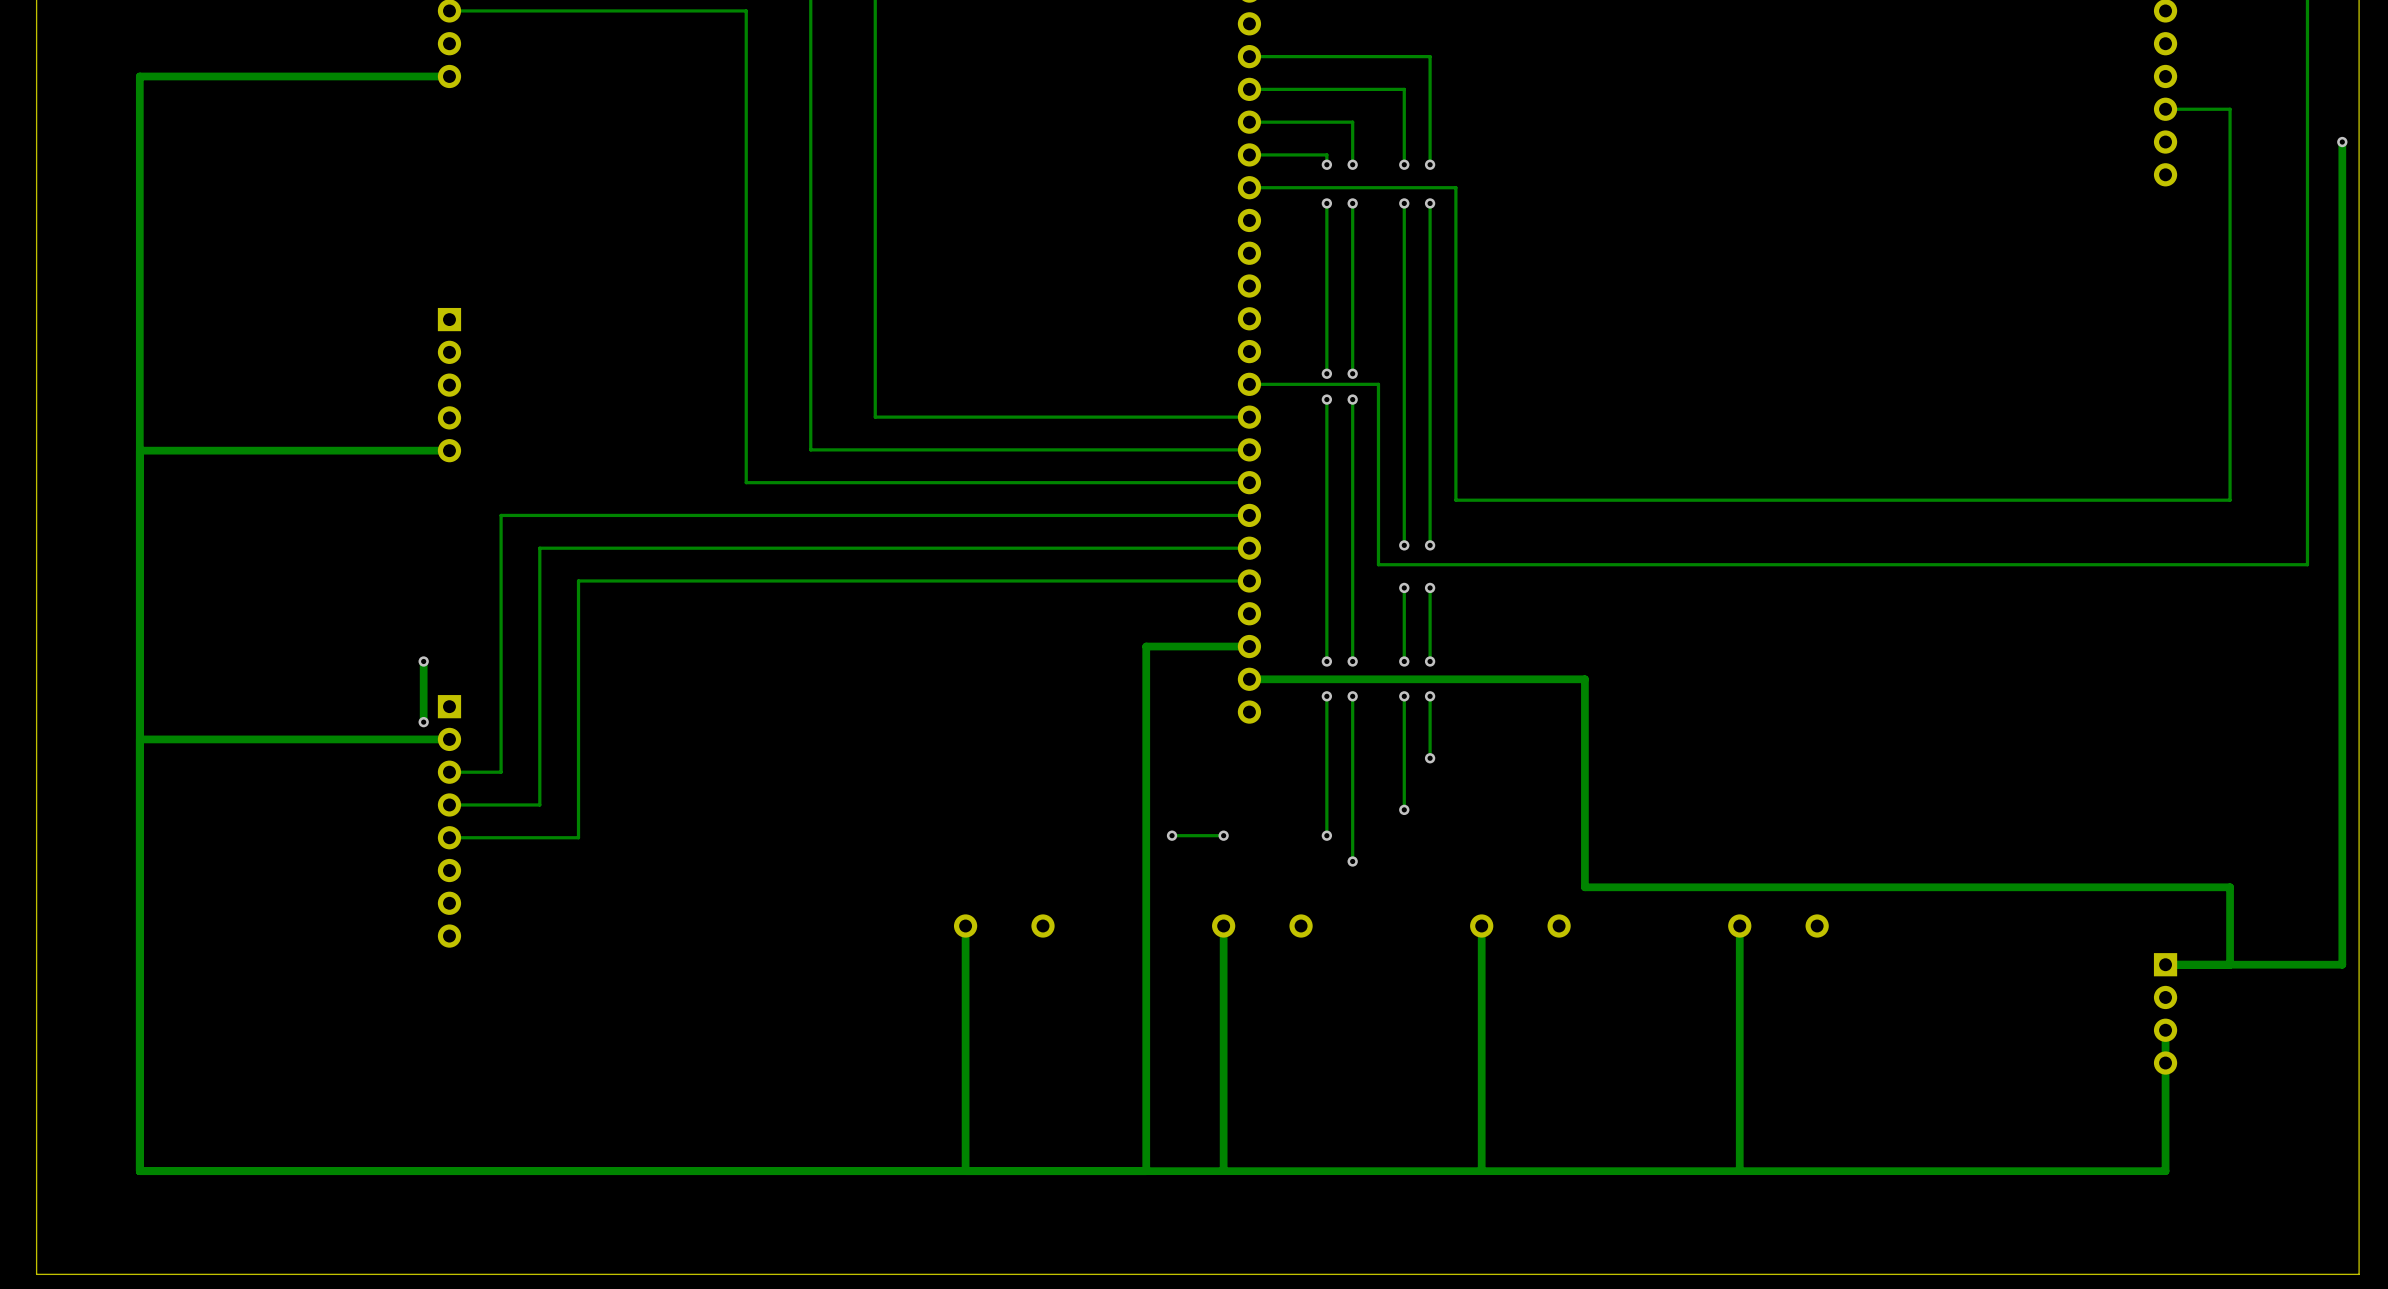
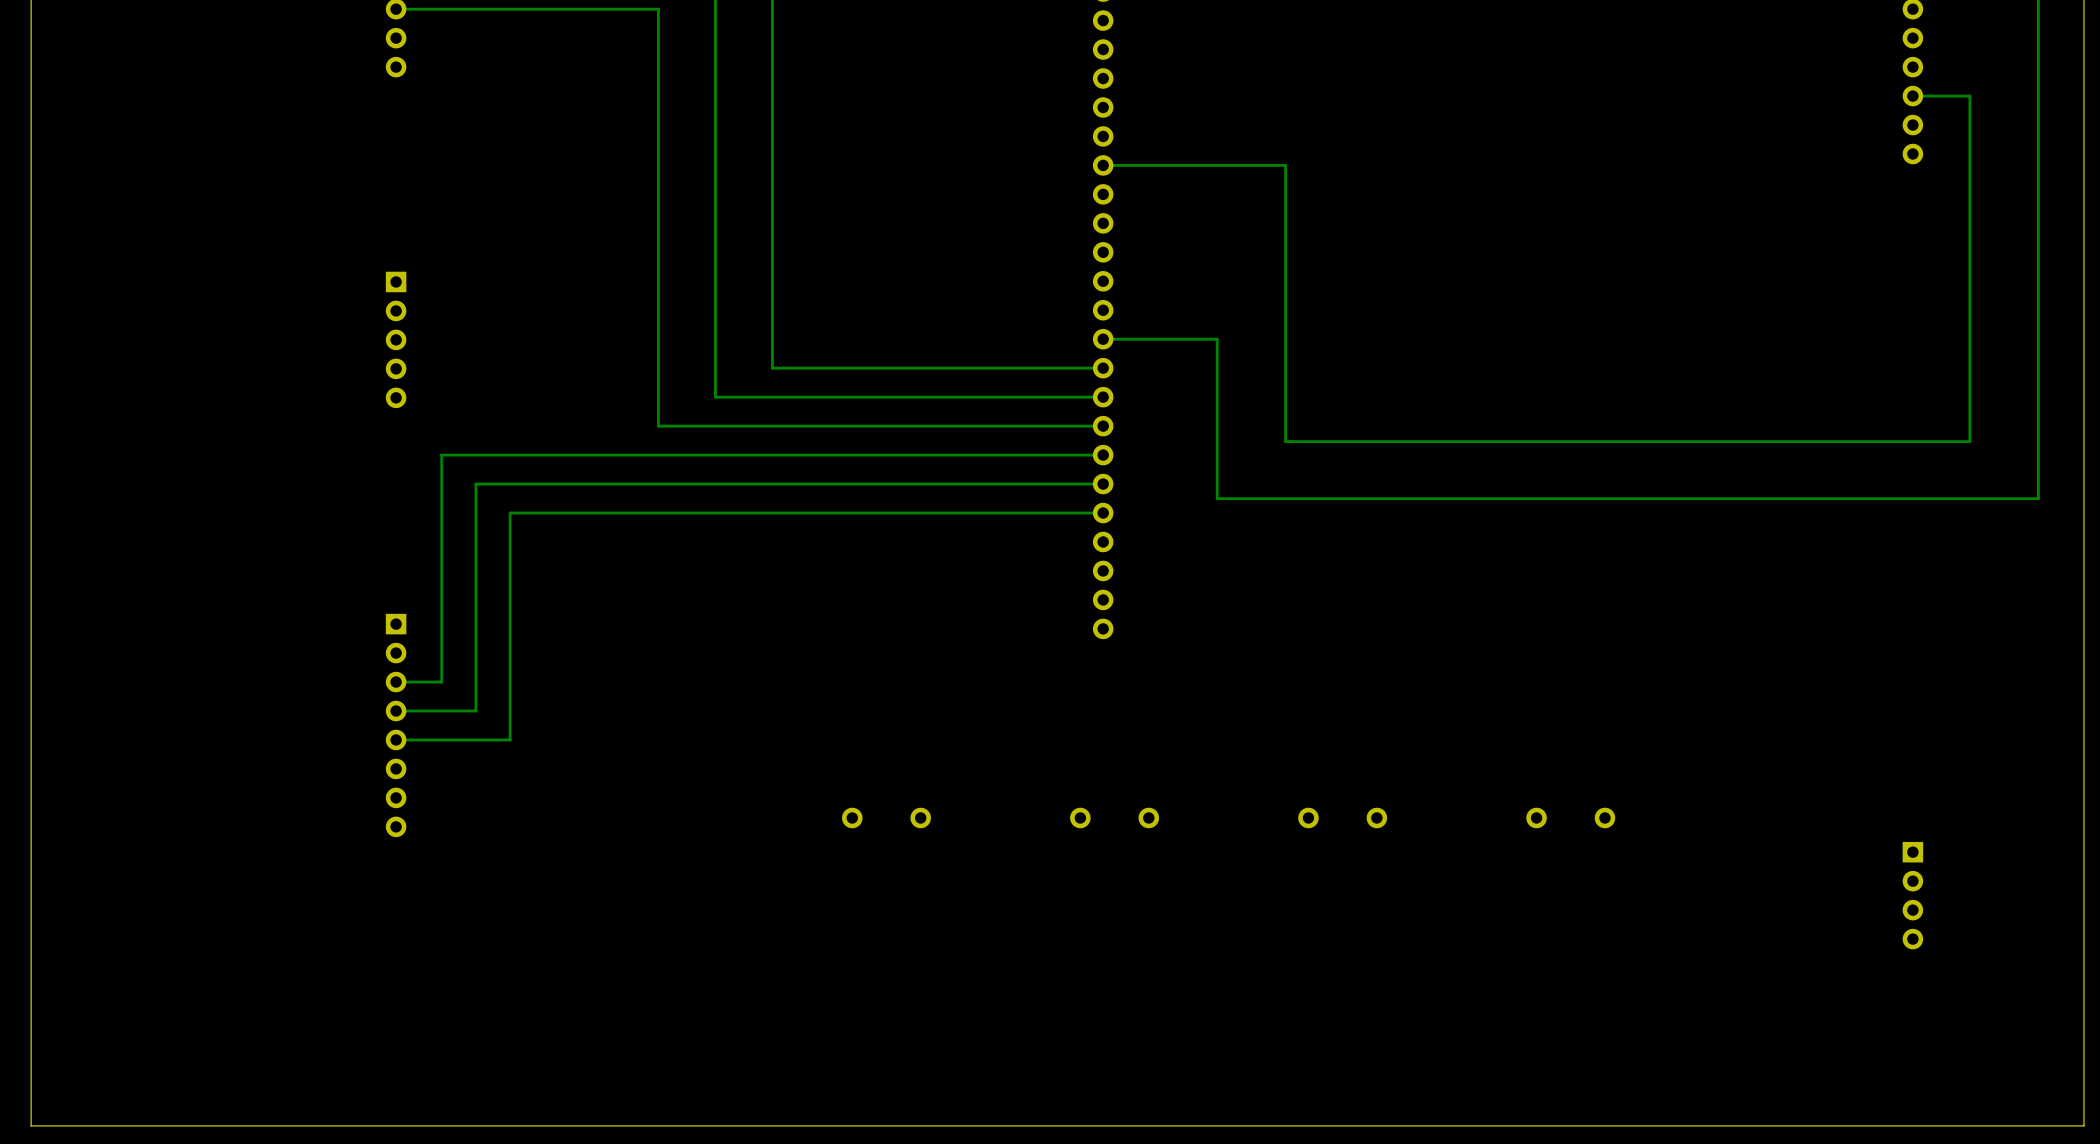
track: (1249, 56) (1430, 56) (1430, 164) -> none
track: (449, 76) (139, 76) (139, 1171) (2165, 1171) (2165, 1030) -> none
track: (1249, 89) (1404, 89) (1404, 164) -> none
track: (1249, 122) (1352, 122) (1352, 164) -> none
track: (2342, 142) (2342, 964) (2165, 964) -> none
via: (2342, 142) -> none
track: (1249, 154) (1326, 154) (1326, 164) -> none
via: (1326, 164) -> none
via: (1352, 164) -> none
via: (1404, 164) -> none
via: (1430, 164) -> none
track: (1326, 203) (1326, 373) -> none
via: (1326, 203) -> none
track: (1352, 203) (1352, 373) -> none
via: (1352, 203) -> none
track: (1404, 203) (1404, 545) -> none
via: (1404, 203) -> none
track: (1430, 203) (1430, 545) -> none
via: (1430, 203) -> none
via: (1326, 373) -> none
via: (1352, 373) -> none
track: (1326, 399) (1326, 661) -> none
via: (1326, 399) -> none
track: (1352, 399) (1352, 661) -> none
via: (1352, 399) -> none
track: (449, 450) (139, 450) -> none
via: (1404, 545) -> none
via: (1430, 545) -> none
track: (1404, 587) (1404, 661) -> none
via: (1404, 587) -> none
track: (1430, 587) (1430, 661) -> none
via: (1430, 587) -> none
track: (1249, 646) (1146, 646) (1146, 1171) -> none
track: (423, 661) (423, 722) -> none
via: (423, 661) -> none
via: (1326, 661) -> none
via: (1352, 661) -> none
via: (1404, 661) -> none
via: (1430, 661) -> none
track: (1249, 679) (1584, 679) (1584, 887) (2230, 887) (2230, 964) -> none
track: (1326, 696) (1326, 835) -> none
via: (1326, 696) -> none
track: (1352, 696) (1352, 861) -> none
via: (1352, 696) -> none
track: (1404, 696) (1404, 809) -> none
via: (1404, 696) -> none
track: (1430, 696) (1430, 758) -> none
via: (1430, 696) -> none
via: (423, 722) -> none
track: (449, 739) (139, 739) -> none
via: (1430, 758) -> none
via: (1404, 809) -> none
via: (1172, 835) -> none
track: (1223, 835) (1172, 835) -> none
via: (1223, 835) -> none
via: (1326, 835) -> none
via: (1352, 861) -> none
track: (965, 925) (965, 1171) -> none
track: (1223, 925) (1223, 1171) -> none
track: (1481, 925) (1481, 1171) -> none
track: (1739, 925) (1739, 1171) -> none

